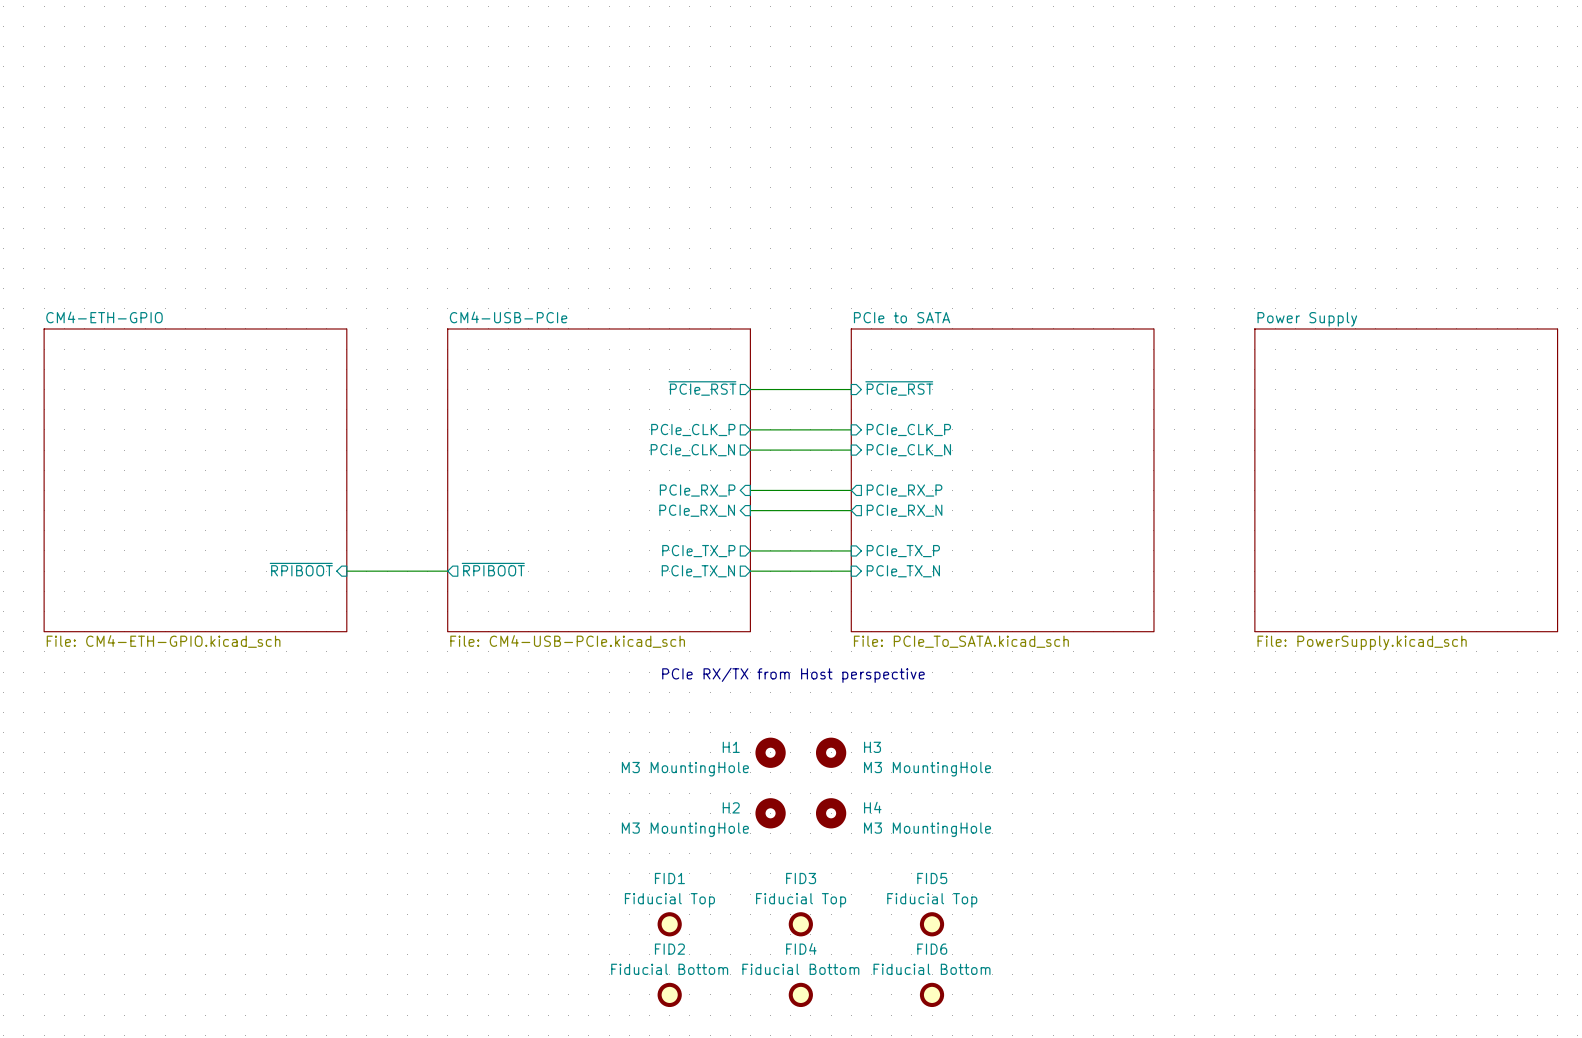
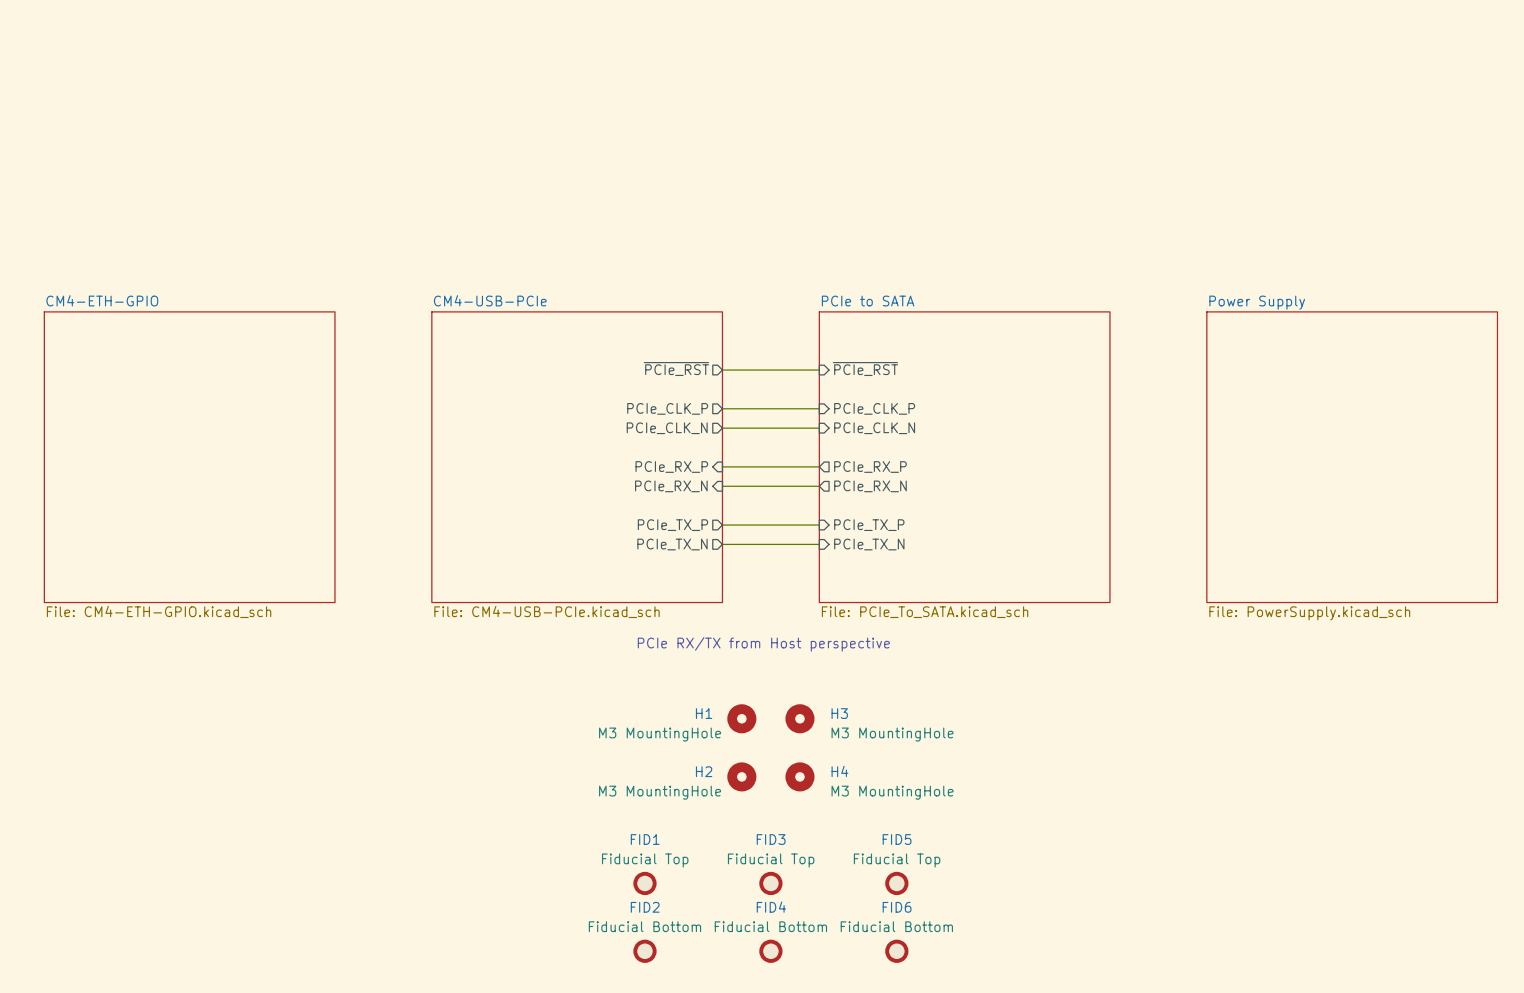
sheet pin: ~{RPIBOOT} (301, 569) -> none
sheet pin: ~{RPIBOOT} (493, 569) -> none
wire: (346, 571) (447, 571) -> none

